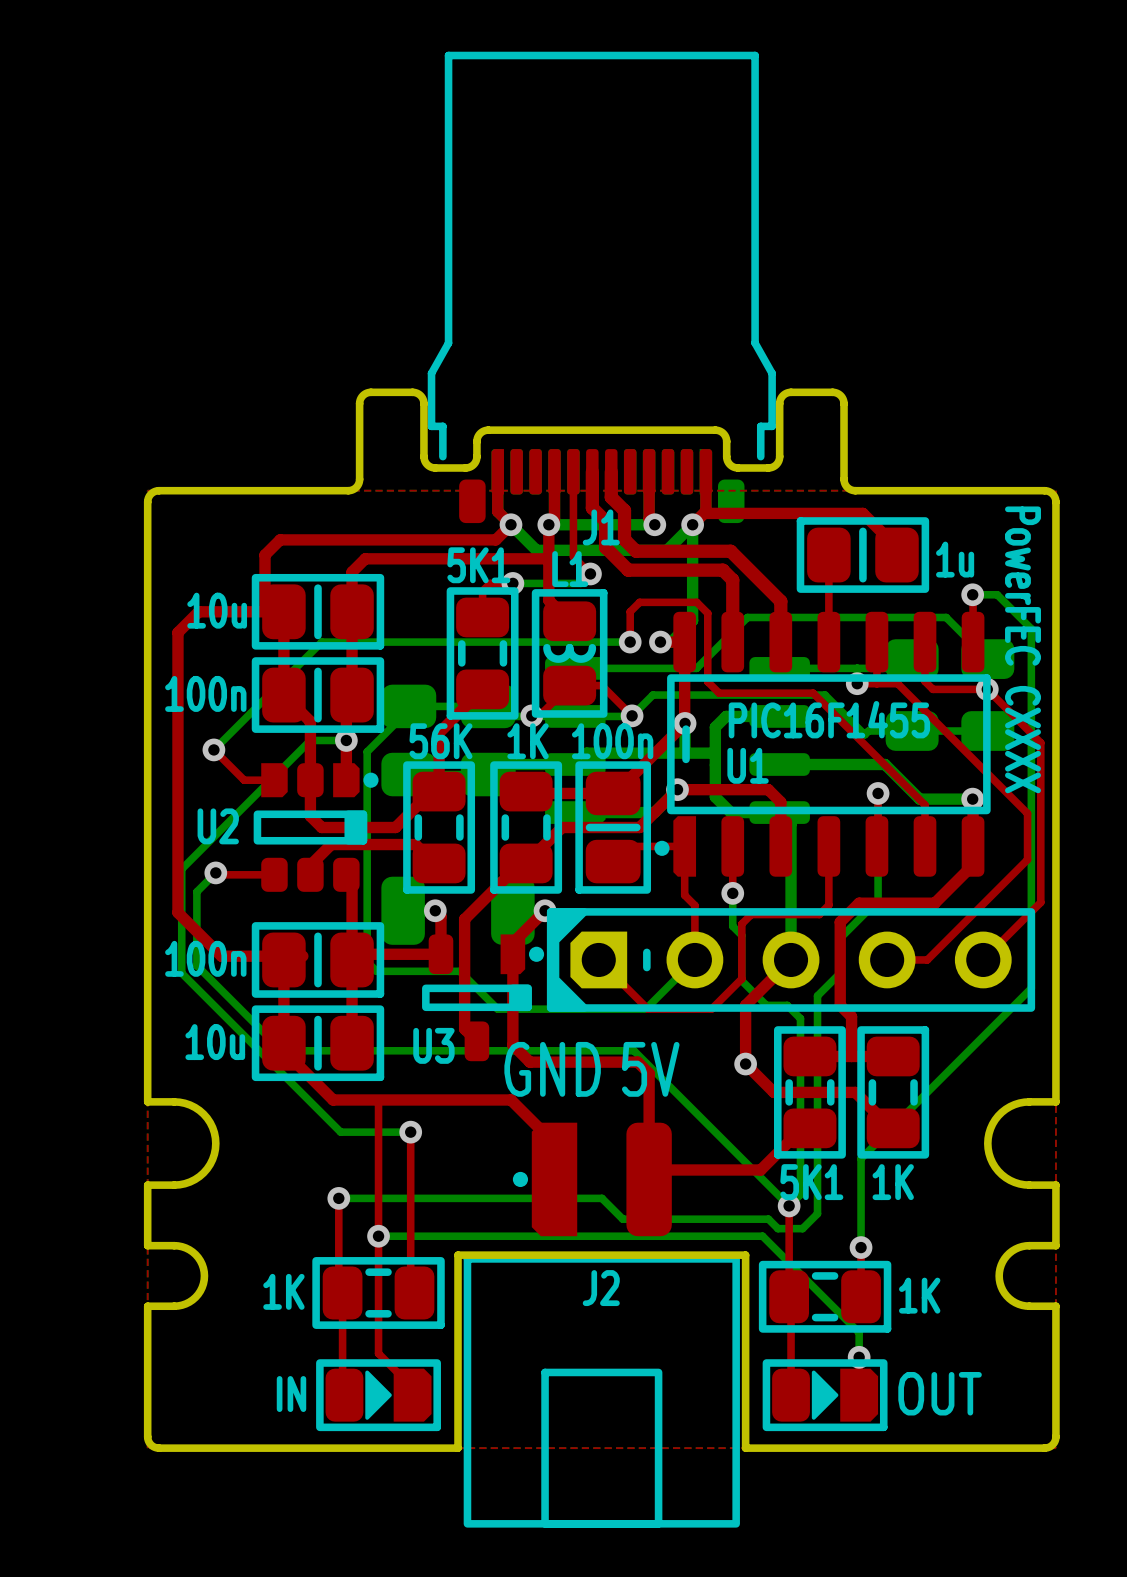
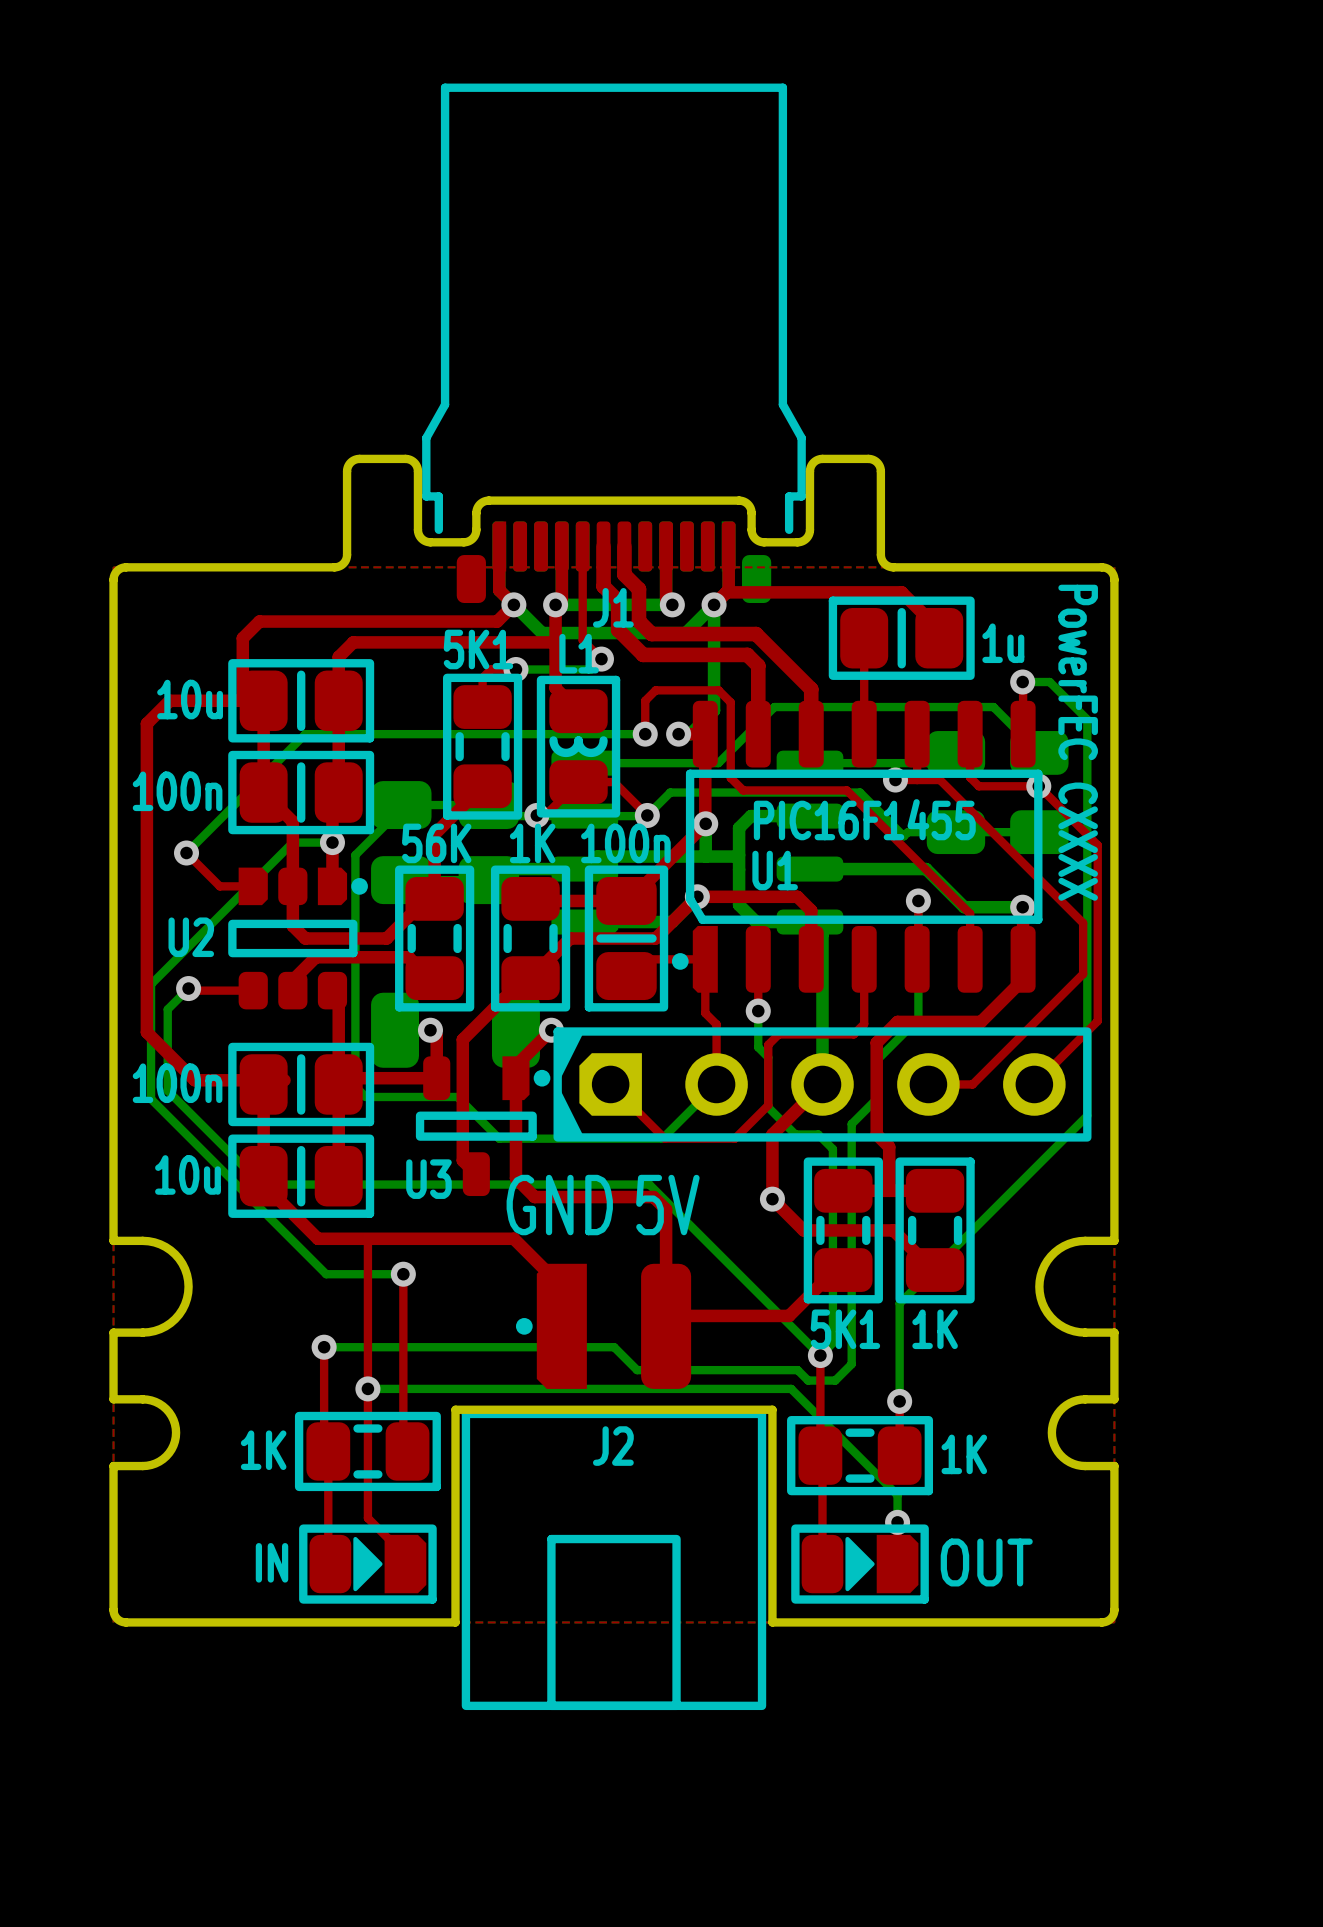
U1 footprint: [654, 611, 991, 877] -> [671, 700, 1043, 993]
U2 footprint: [253, 763, 379, 892] -> [228, 867, 368, 1010]
part footprint: [546, 908, 1036, 1012] -> [553, 1027, 1092, 1142]
U3 footprint: [422, 934, 545, 1062] -> [415, 1056, 551, 1197]

